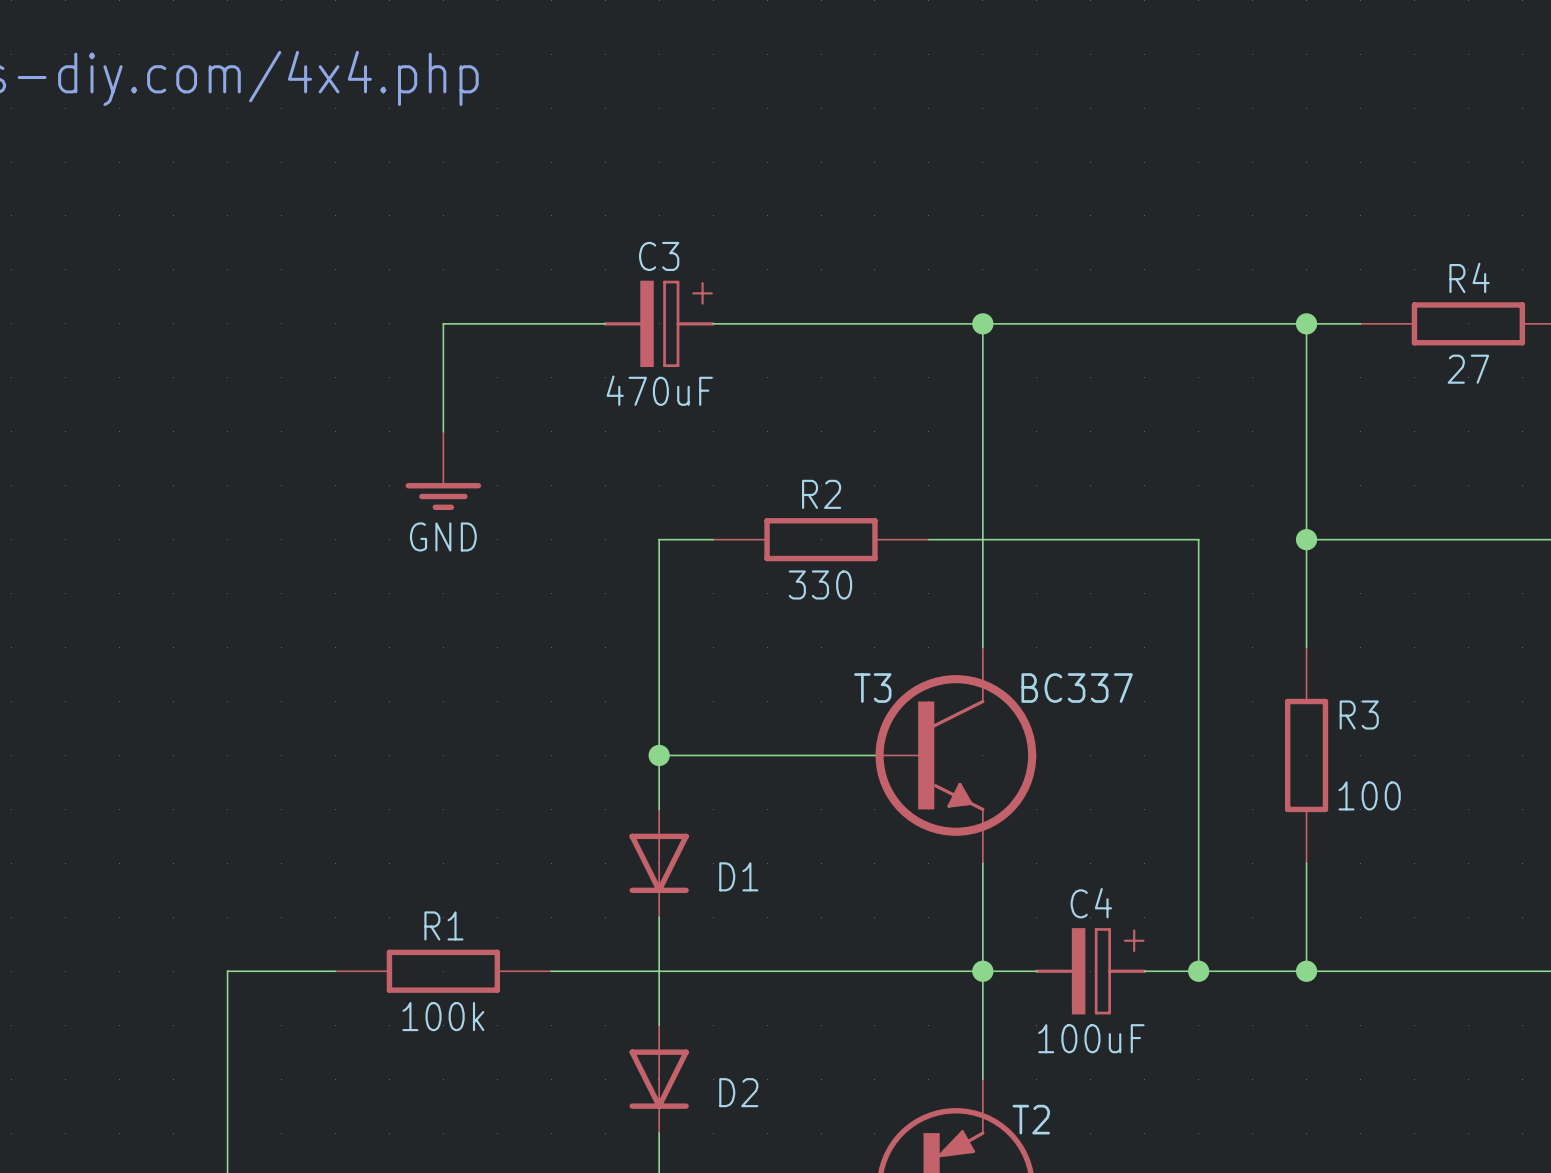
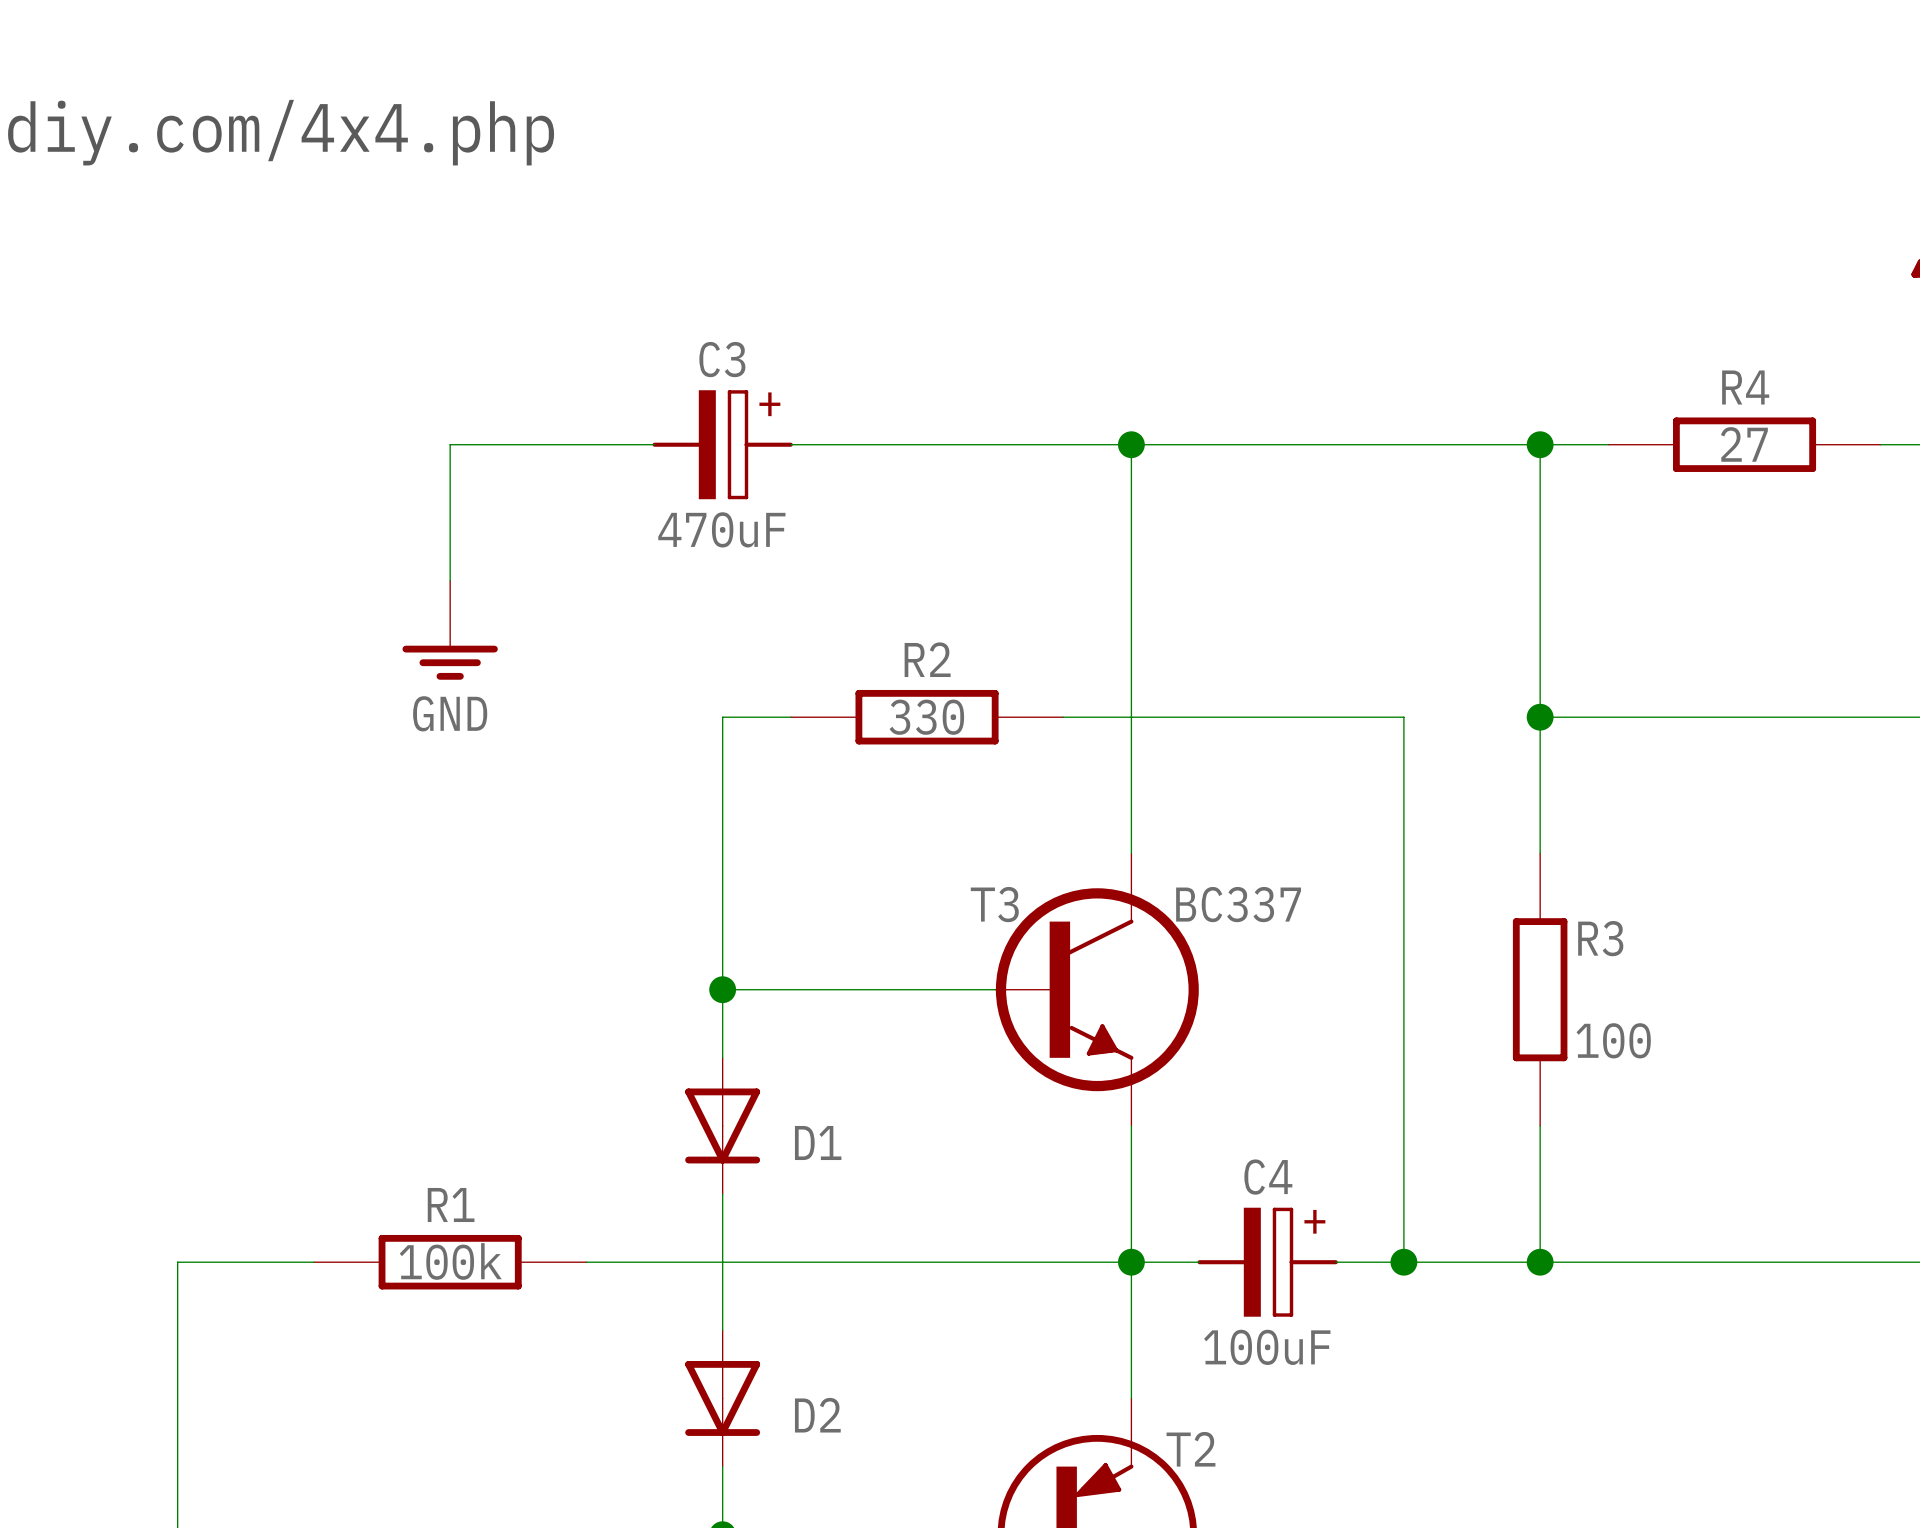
R4 value position: 27 (1468, 369) -> 27 (1744, 444)
R2 value position: 330 (820, 584) -> 330 (926, 717)
R1 value position: 100k (443, 1016) -> 100k (450, 1261)

